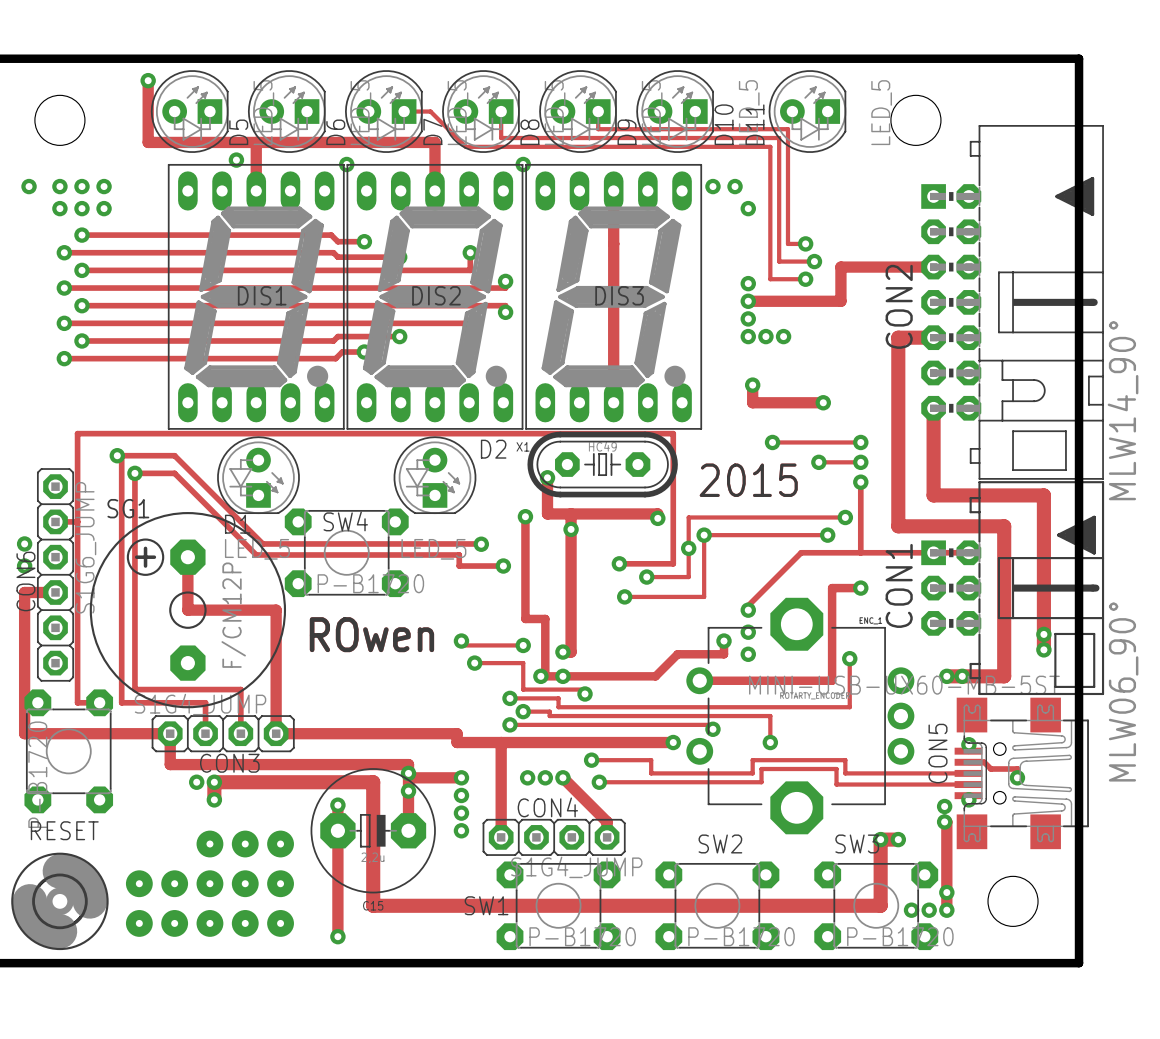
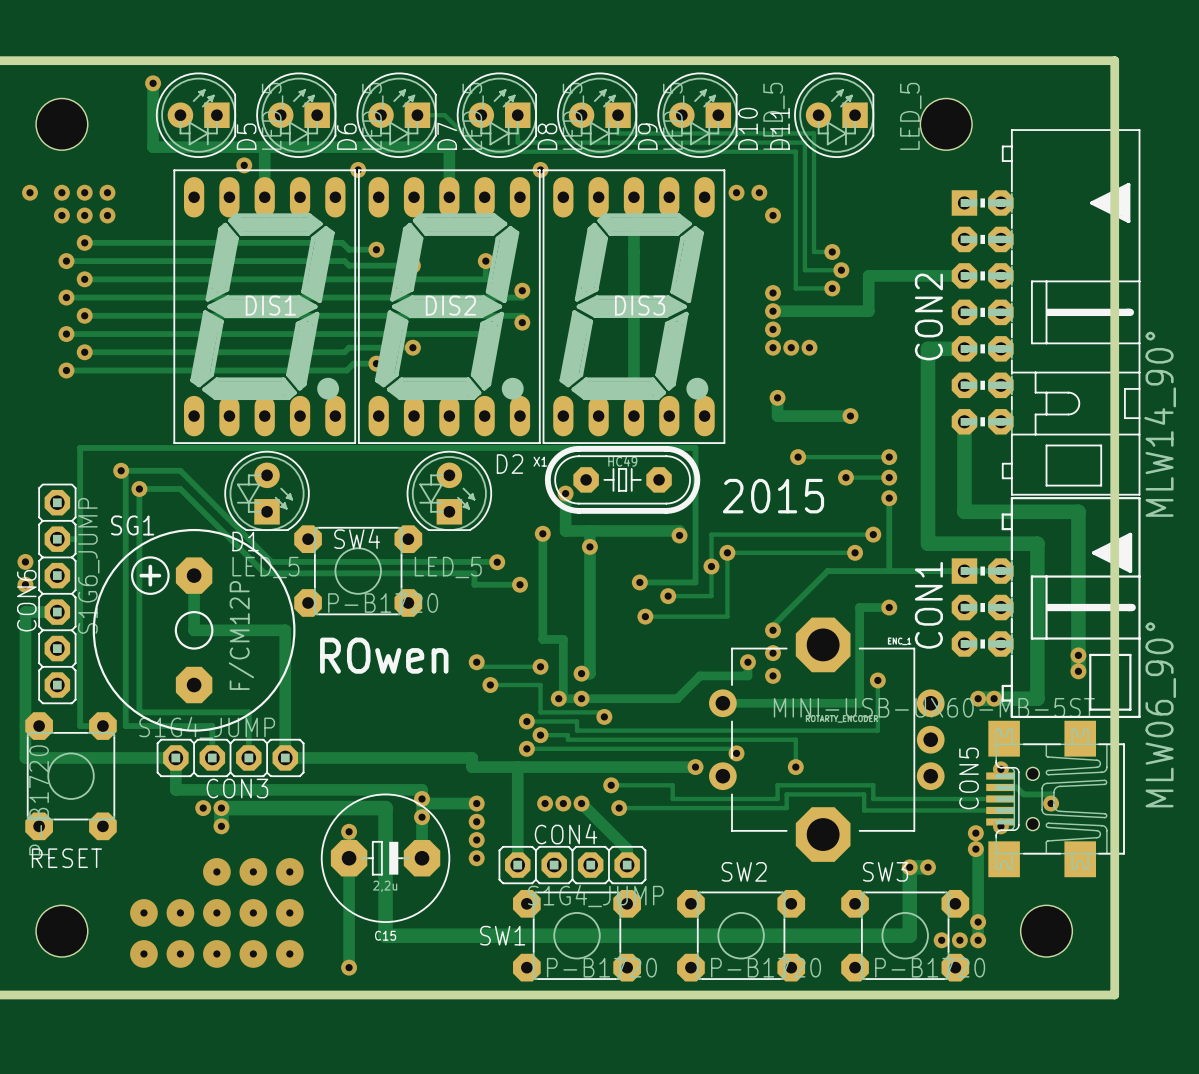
part side: top (59, 901) -> bottom (61, 931)

